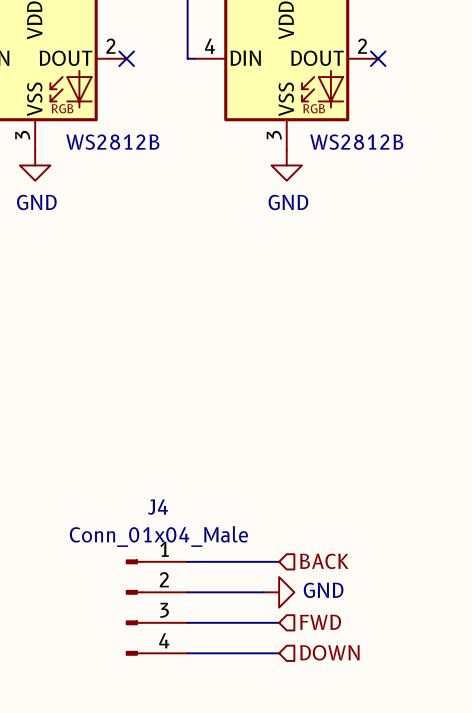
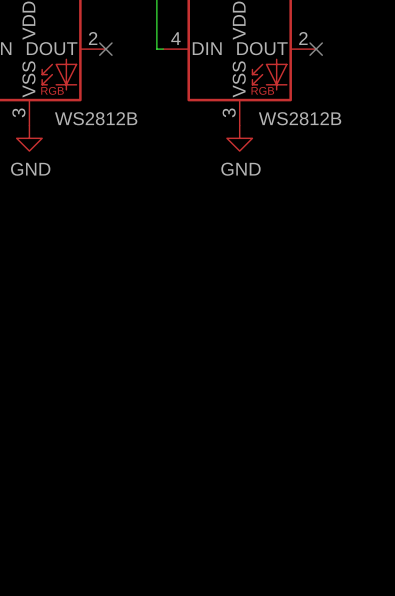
wire: (187, 561) (279, 561) -> none
hierarchical label: BACK (324, 561) -> none
wire: (187, 592) (263, 592) -> none
power symbol: GND (279, 592) -> none
J4: Conn_01x04_Male (156, 607) -> none
wire: (187, 622) (279, 622) -> none
hierarchical label: FWD (320, 622) -> none
hierarchical label: DOWN (329, 652) -> none
wire: (187, 653) (279, 653) -> none

